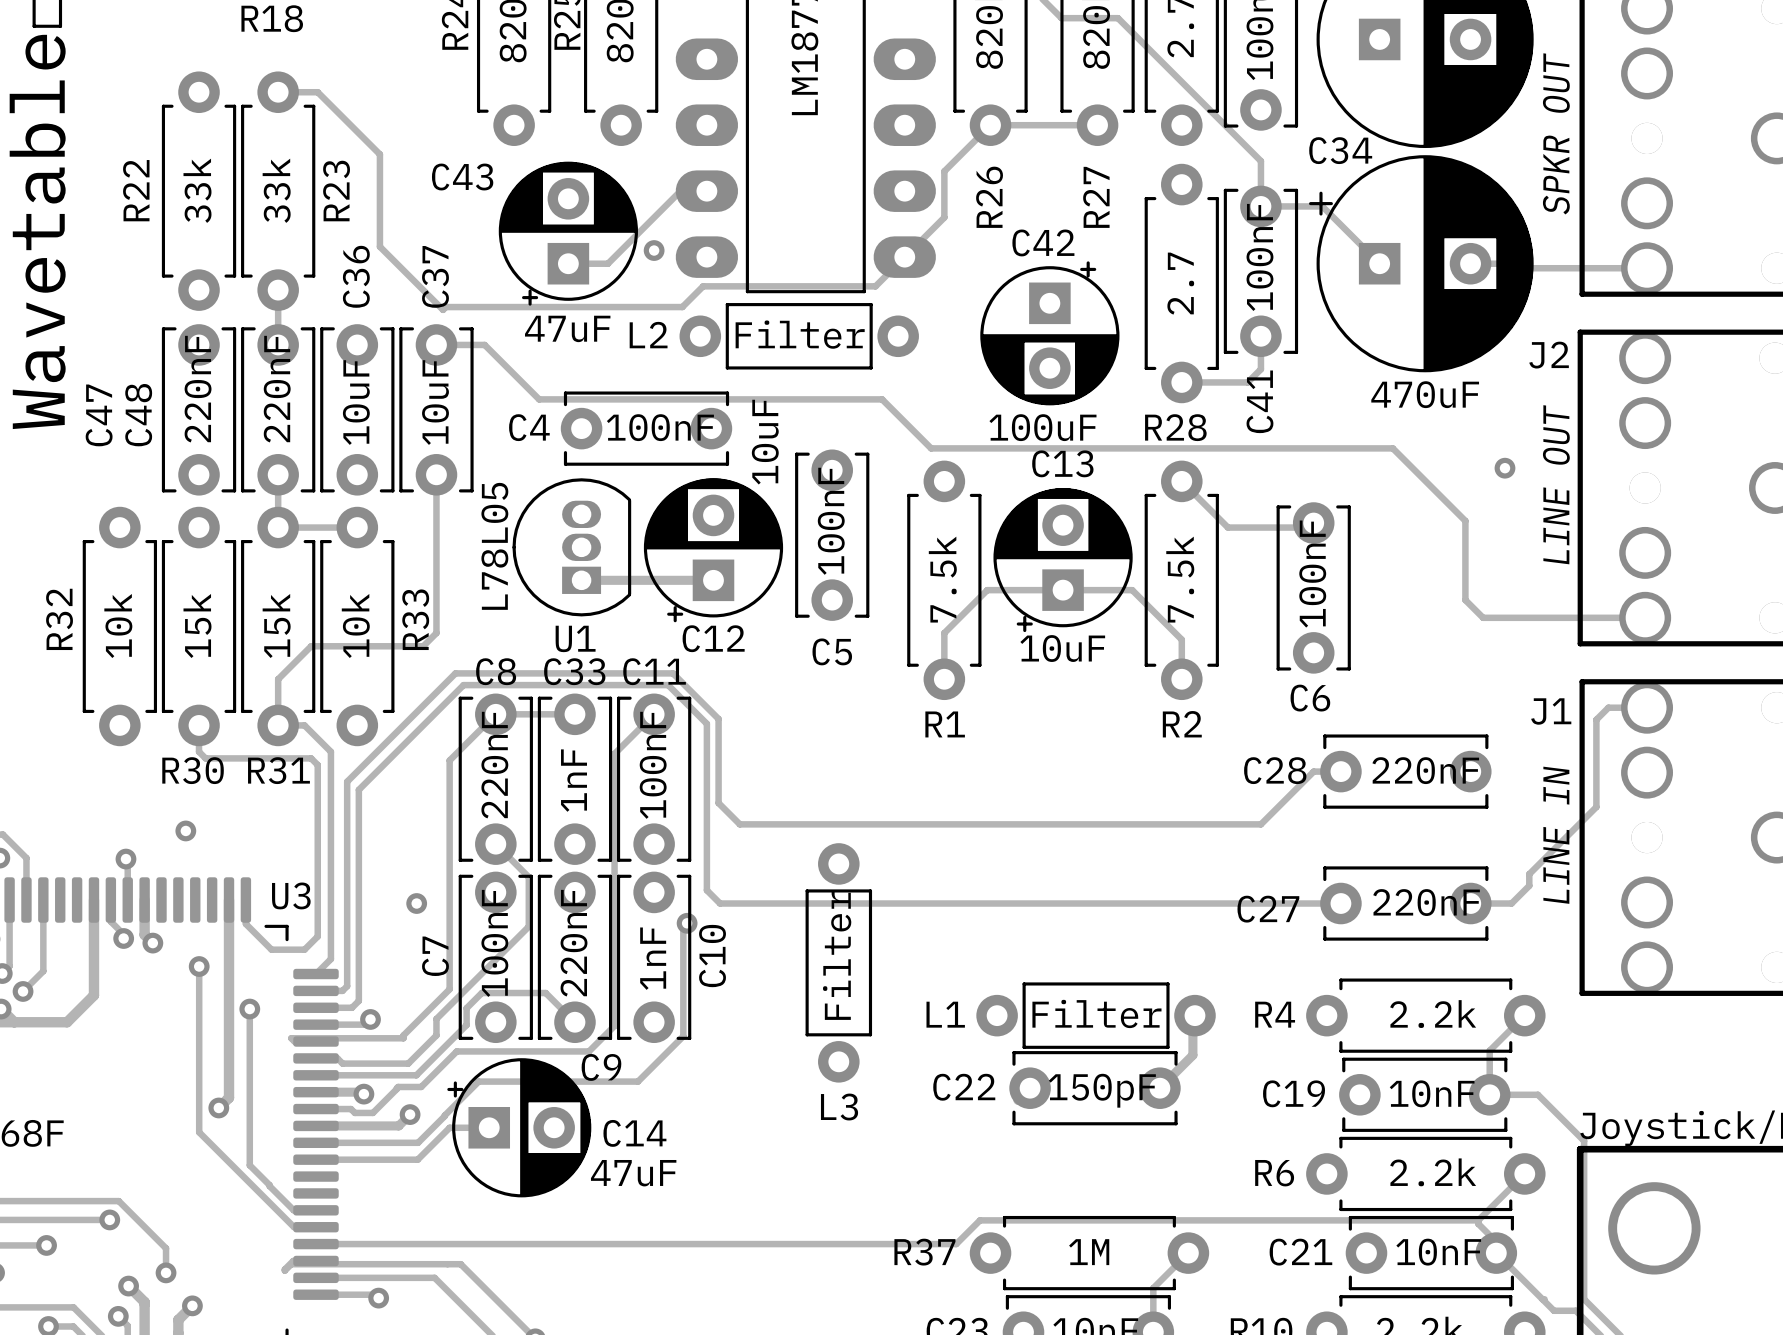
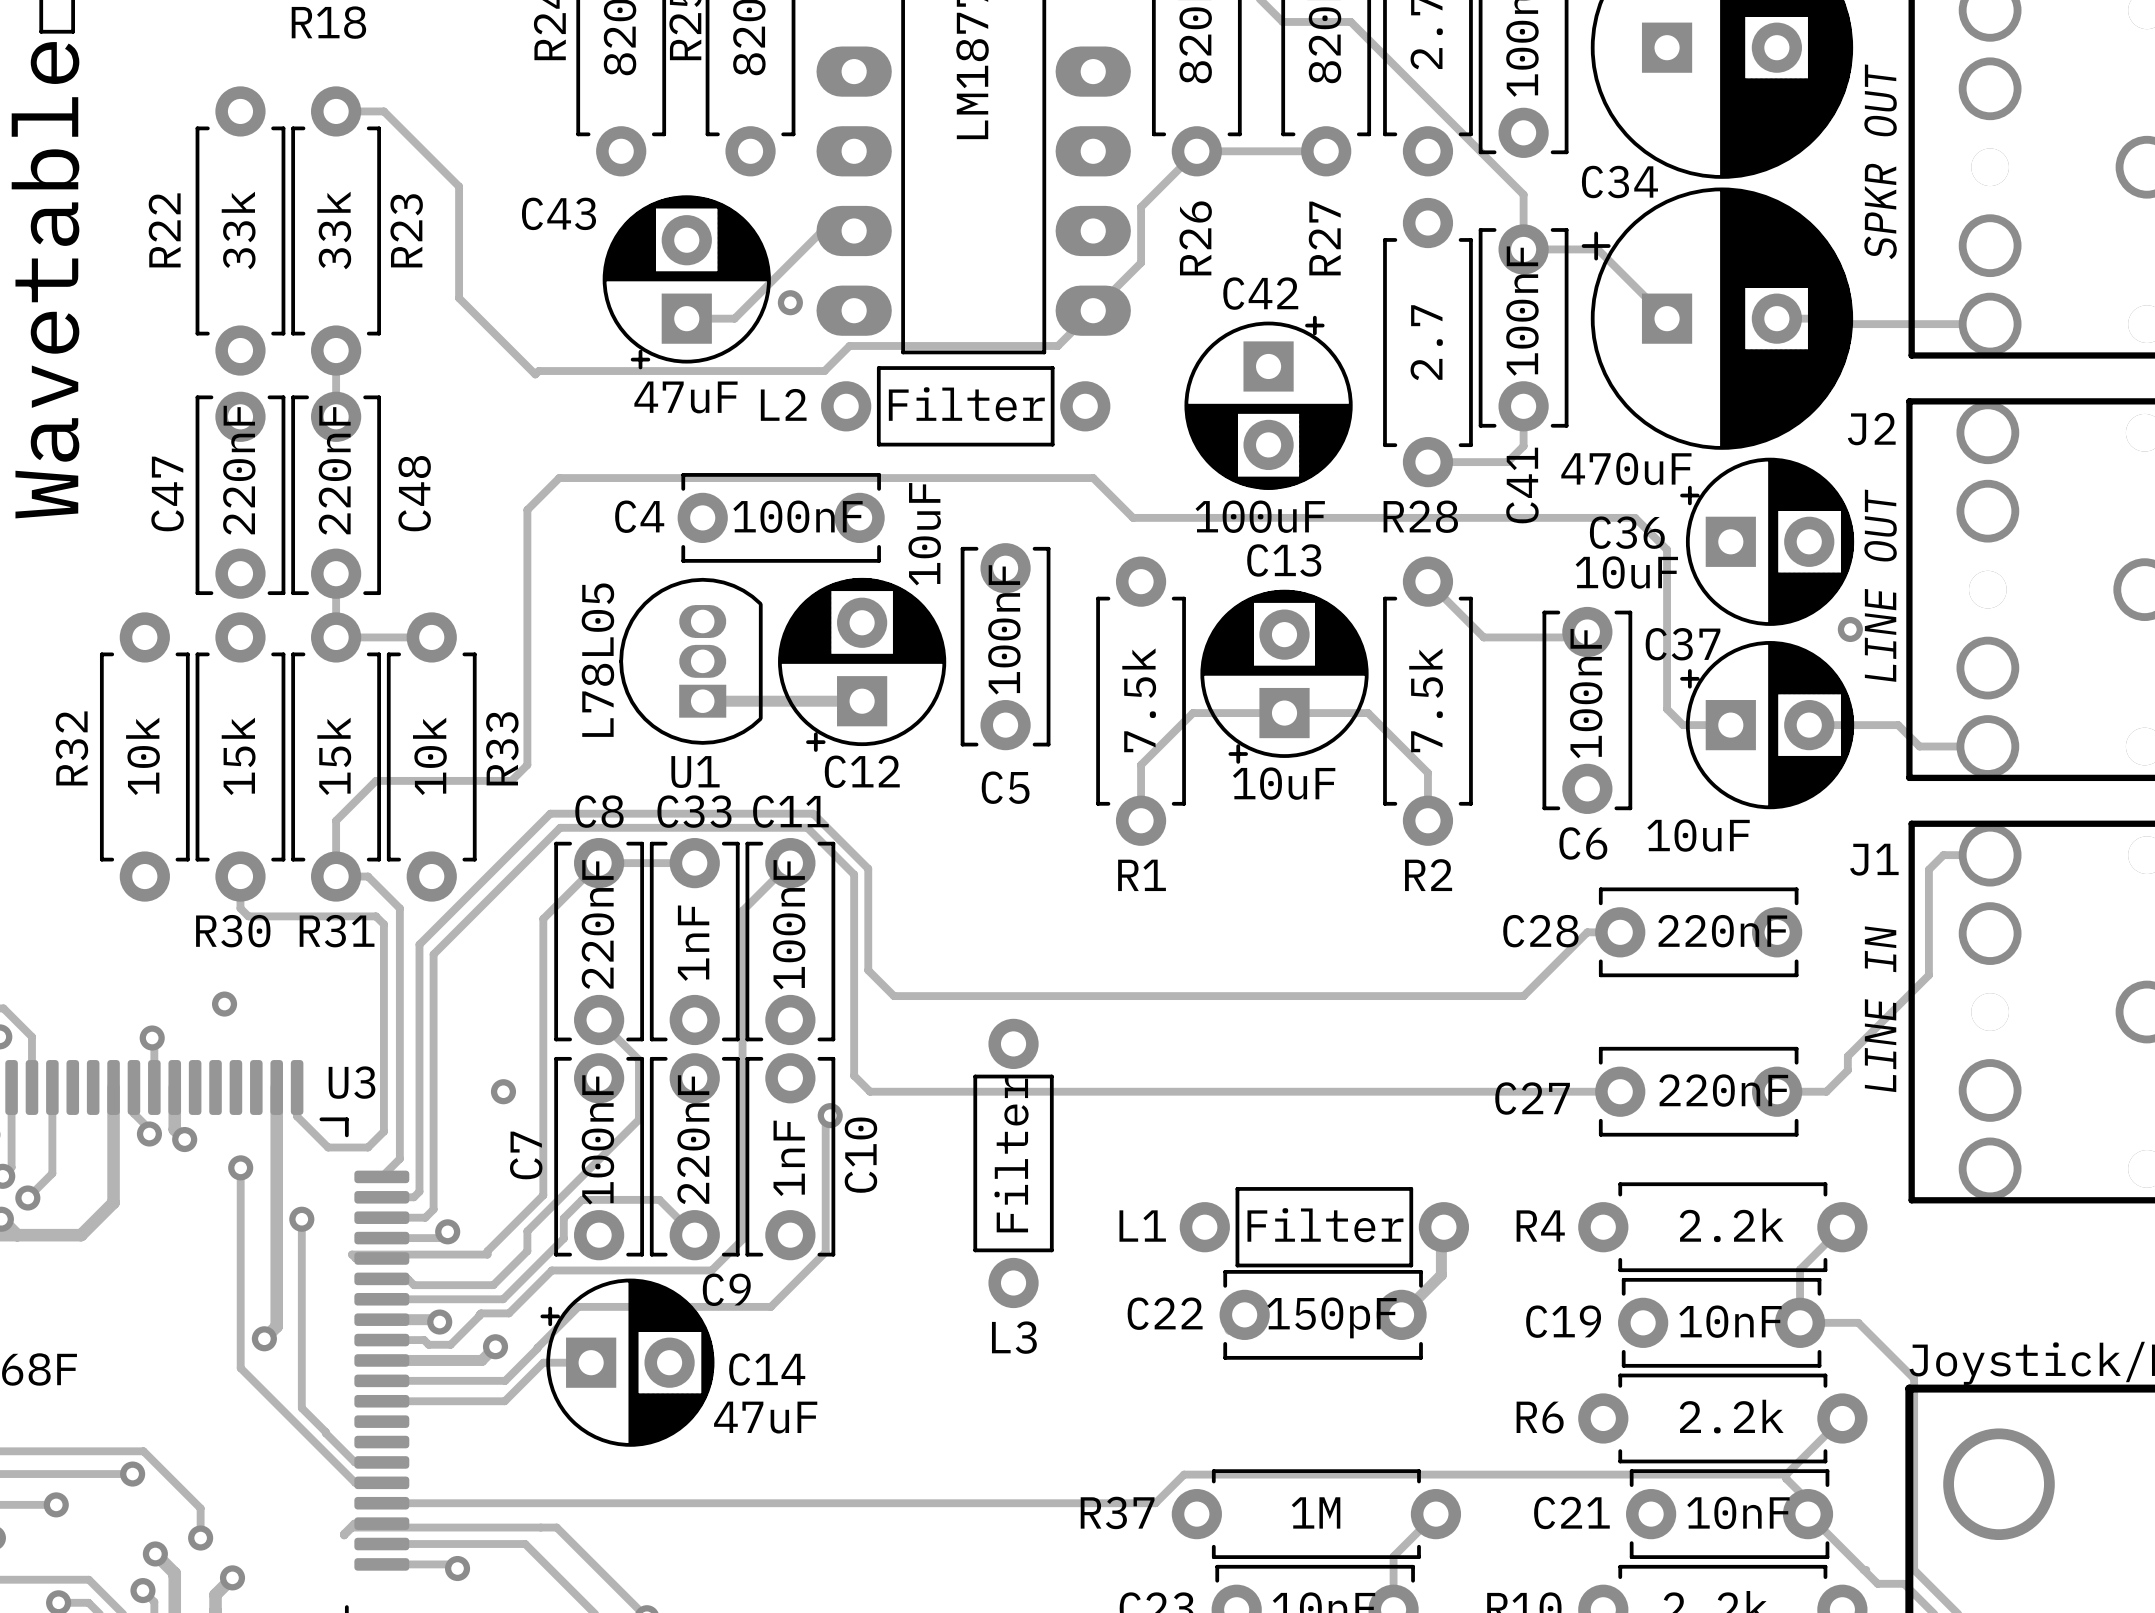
C36 name position: C36 (356, 276) -> C36 (1627, 532)
C37 name position: C37 (435, 276) -> C37 (1683, 644)
C36 footprint: [320, 324, 395, 496] -> [1680, 457, 1855, 626]
C37 footprint: [399, 324, 474, 496] -> [1680, 641, 1855, 810]
track: (436, 344) (484, 344) (539, 399) (882, 399) (931, 448) (1392, 448) (1465, 520) (1465, 600) (1483, 617) (1588, 617) -> (1809, 725) (1898, 725) (1919, 746)
C34 value position: 470uF (1425, 394) -> 470uF (1626, 468)
C36 value position: 10uF (356, 402) -> 10uF (1626, 572)
C37 value position: 10uF (435, 402) -> 10uF (1698, 835)
C47 name position: C47 (99, 415) -> C47 (167, 493)
C48 name position: C48 (138, 415) -> C48 (414, 493)
via position: (1504, 468) -> (1850, 629)
track: none -> (527, 573) (527, 509) (559, 478) (1093, 478) (1133, 517) (1635, 517) (1667, 549) (1667, 709) (1683, 725) (1730, 725)

